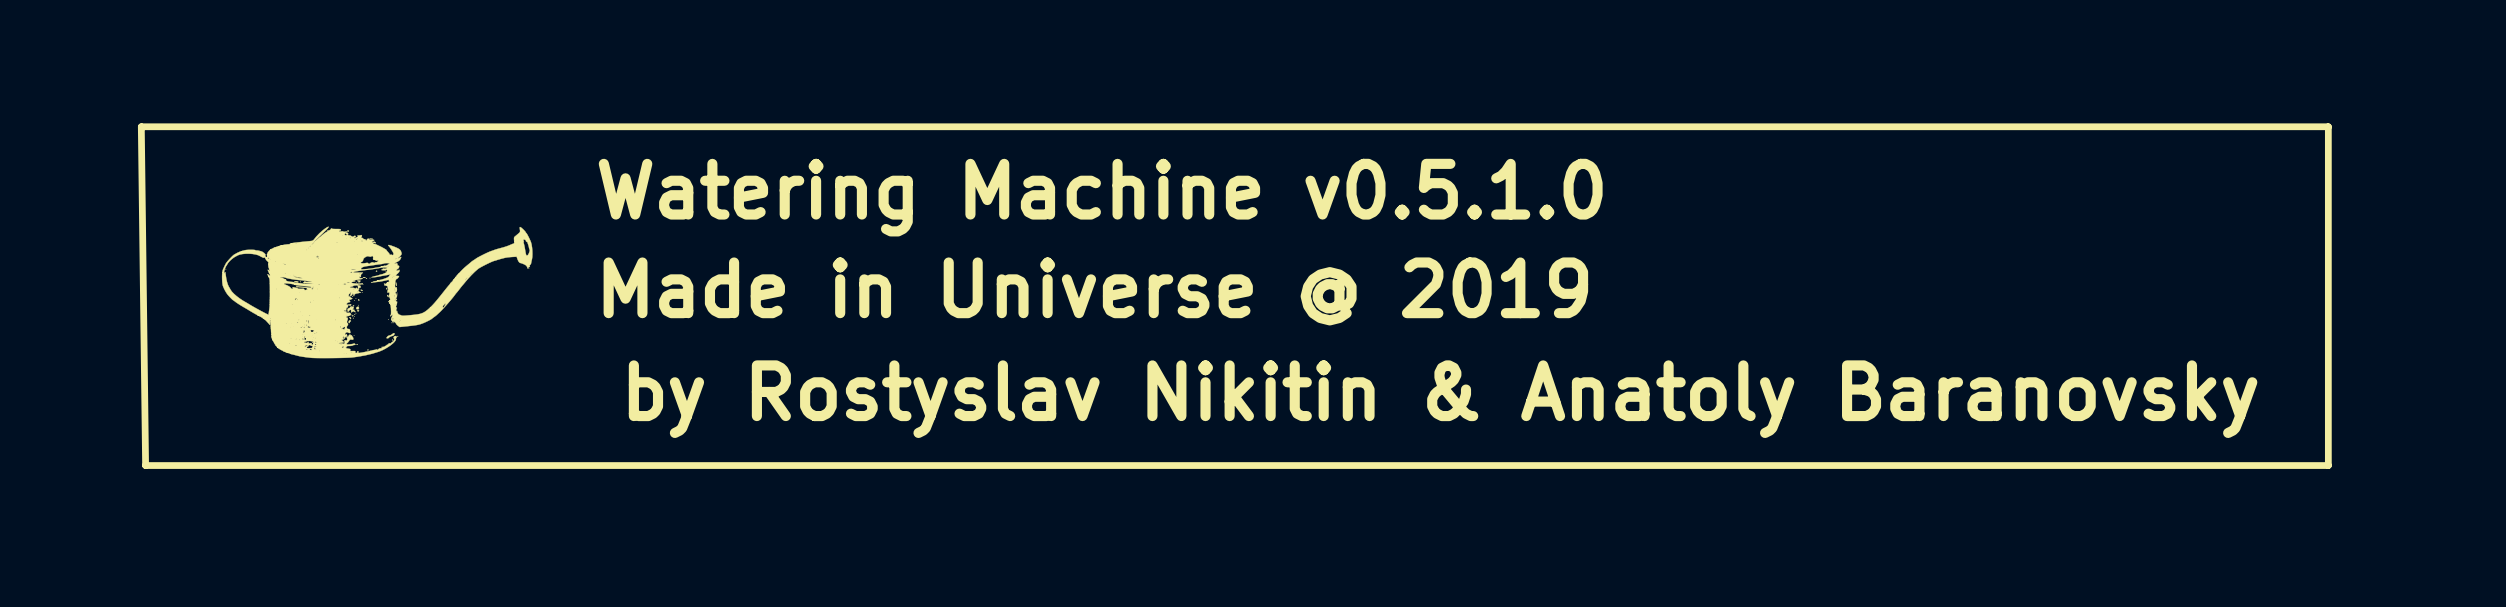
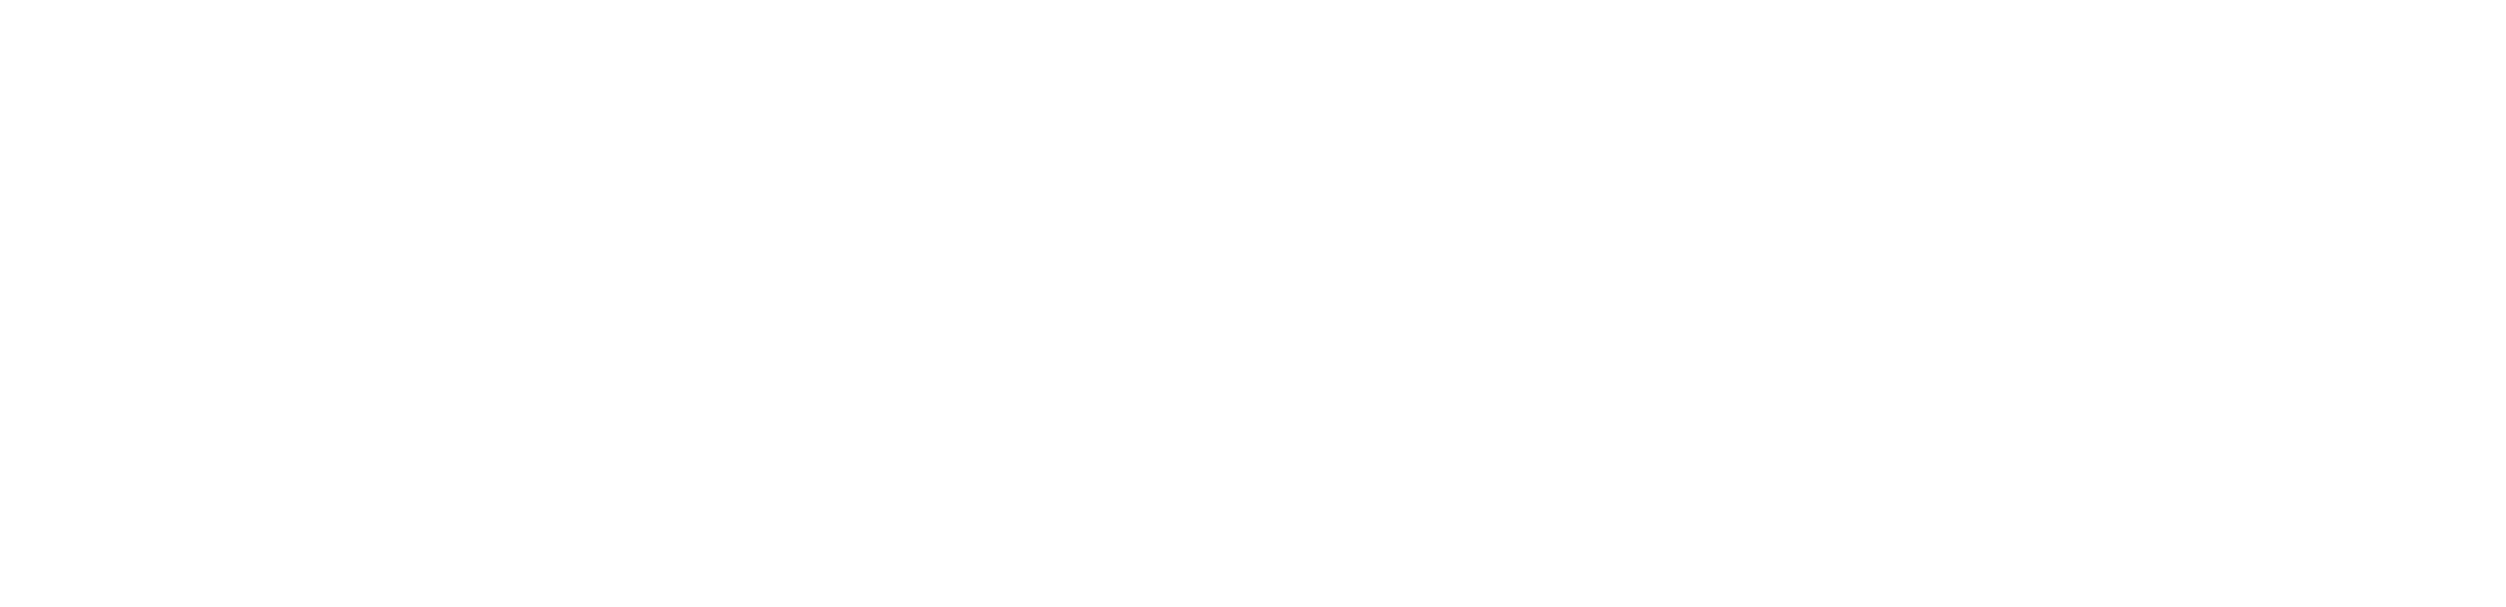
line: (141, 126) (2328, 126) (2328, 465) (145, 465) (141, 126) -> none
text: Watering Machine v0.5.1.0 (1100, 197) -> none
drawing: [221, 226, 533, 359] -> none
text: Made in Universe @ 2019 (1095, 291) -> none
text: by Rostyslav Nikitin & Anatoly Baranovsky (1443, 399) -> none

